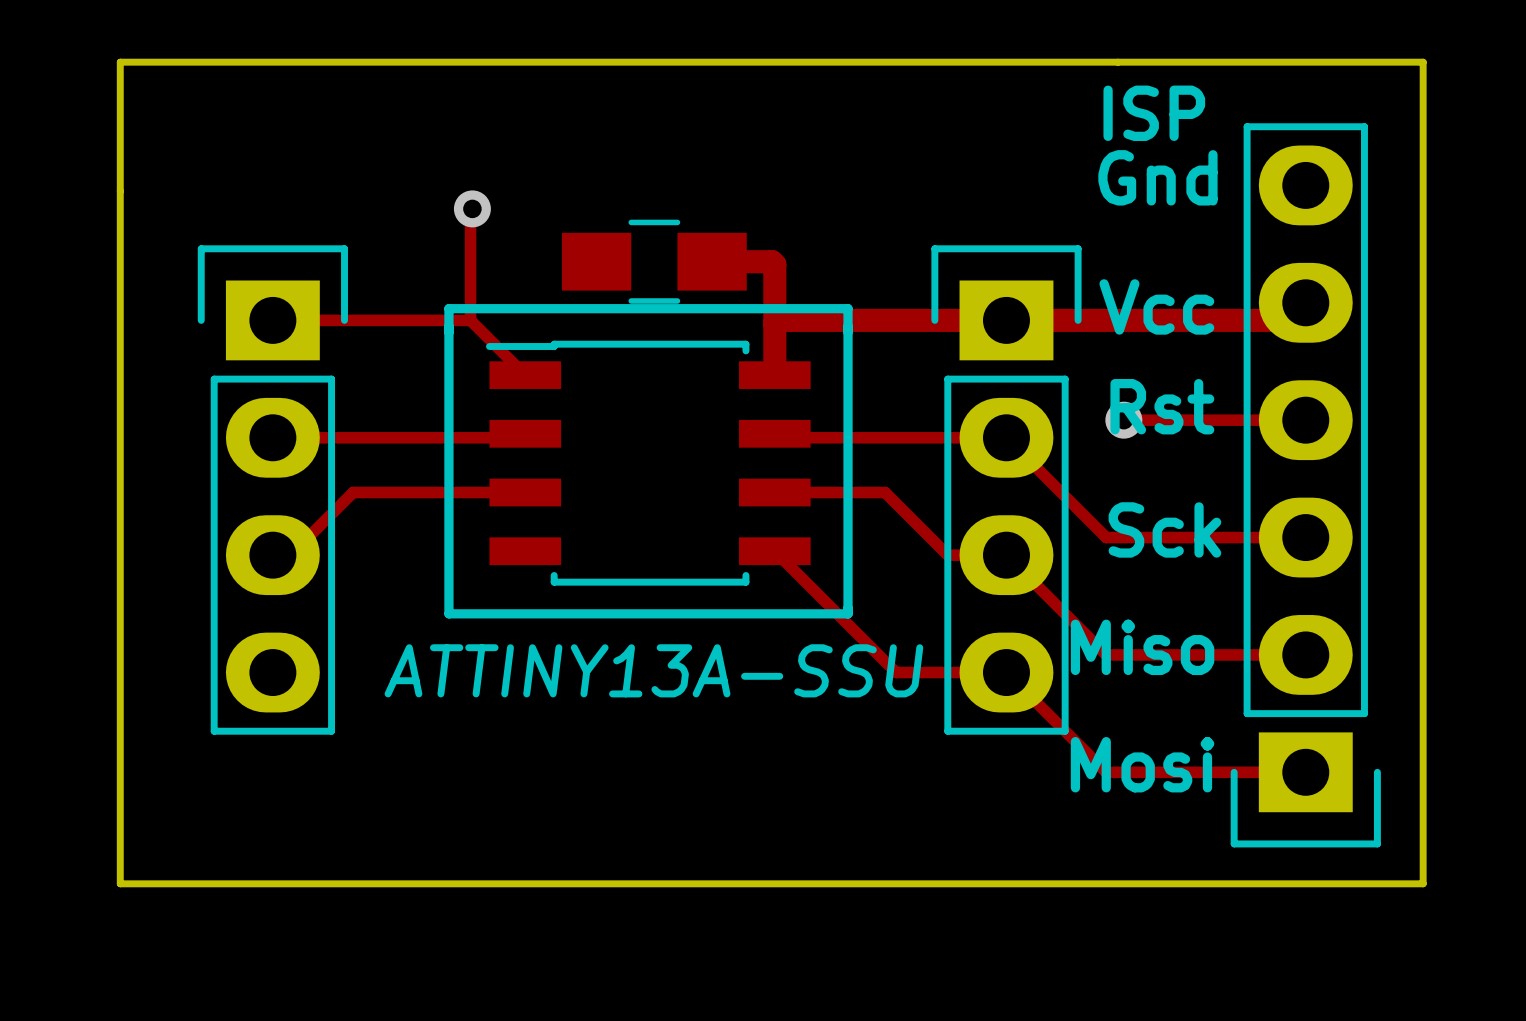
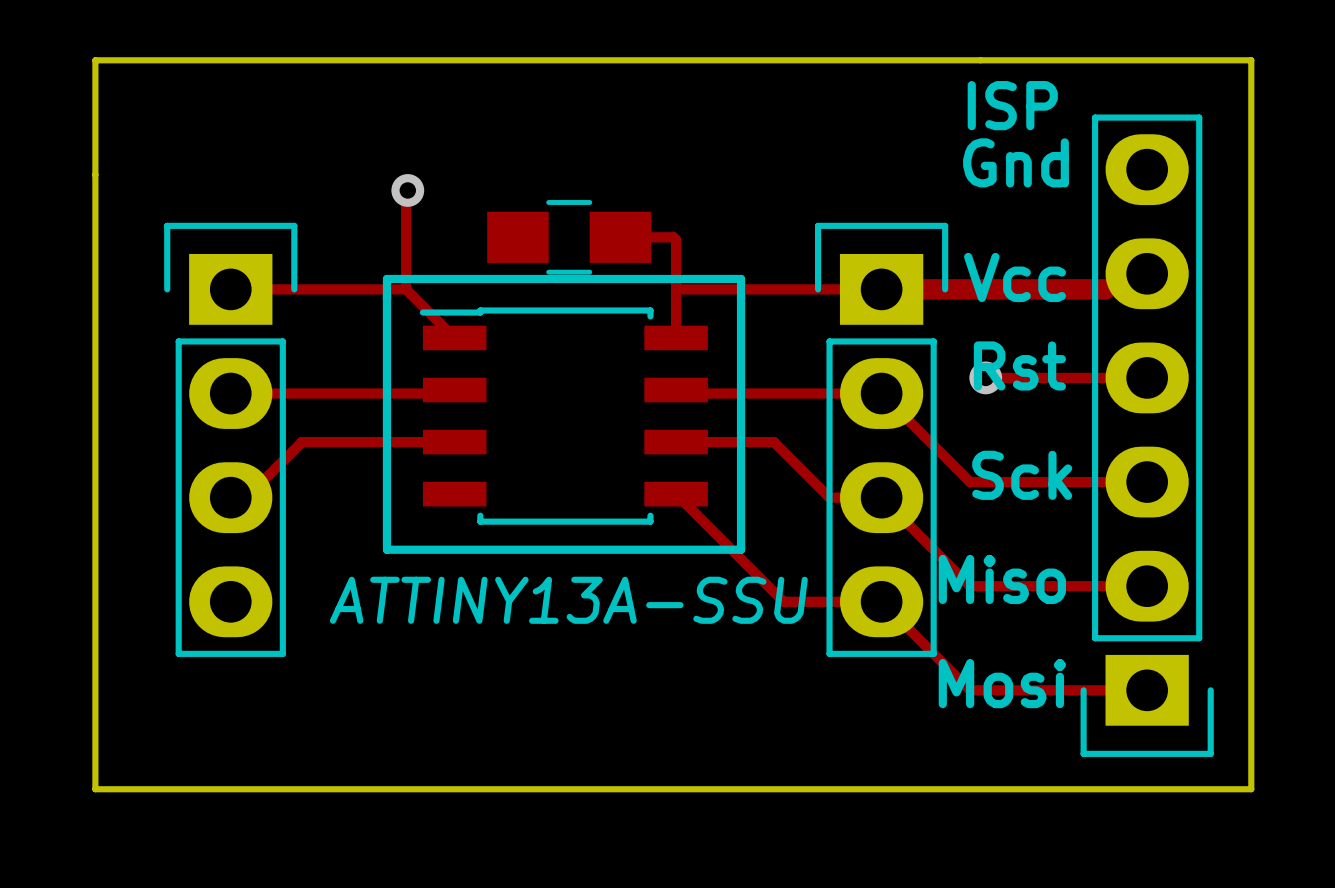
track width: thick (712, 261) (772, 261) (774, 264) (774, 375) -> thin (620, 237) (673, 237) (676, 239) (676, 337)
track width: thick (1006, 320) (777, 320) (774, 323) -> thin (881, 289) (678, 289) (676, 291)
track width: thick (1258, 320) (1288, 320) -> thin (1105, 289) (1131, 289)

